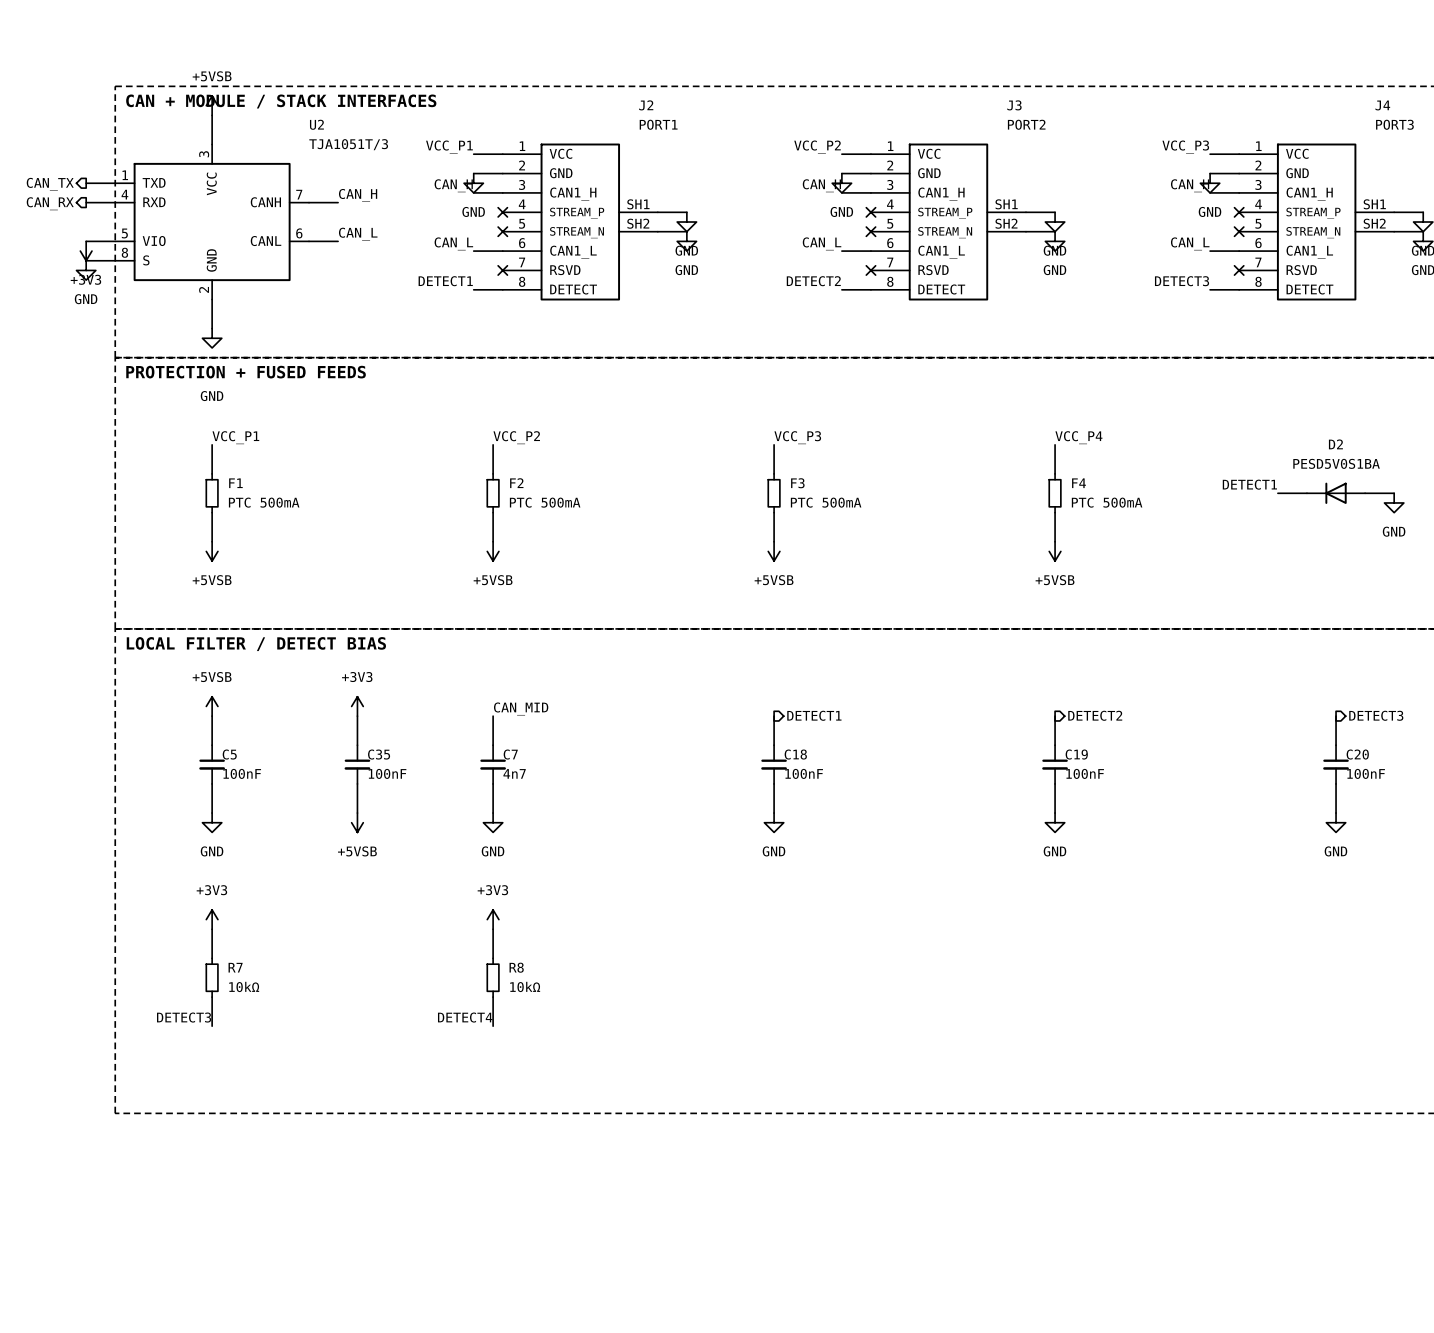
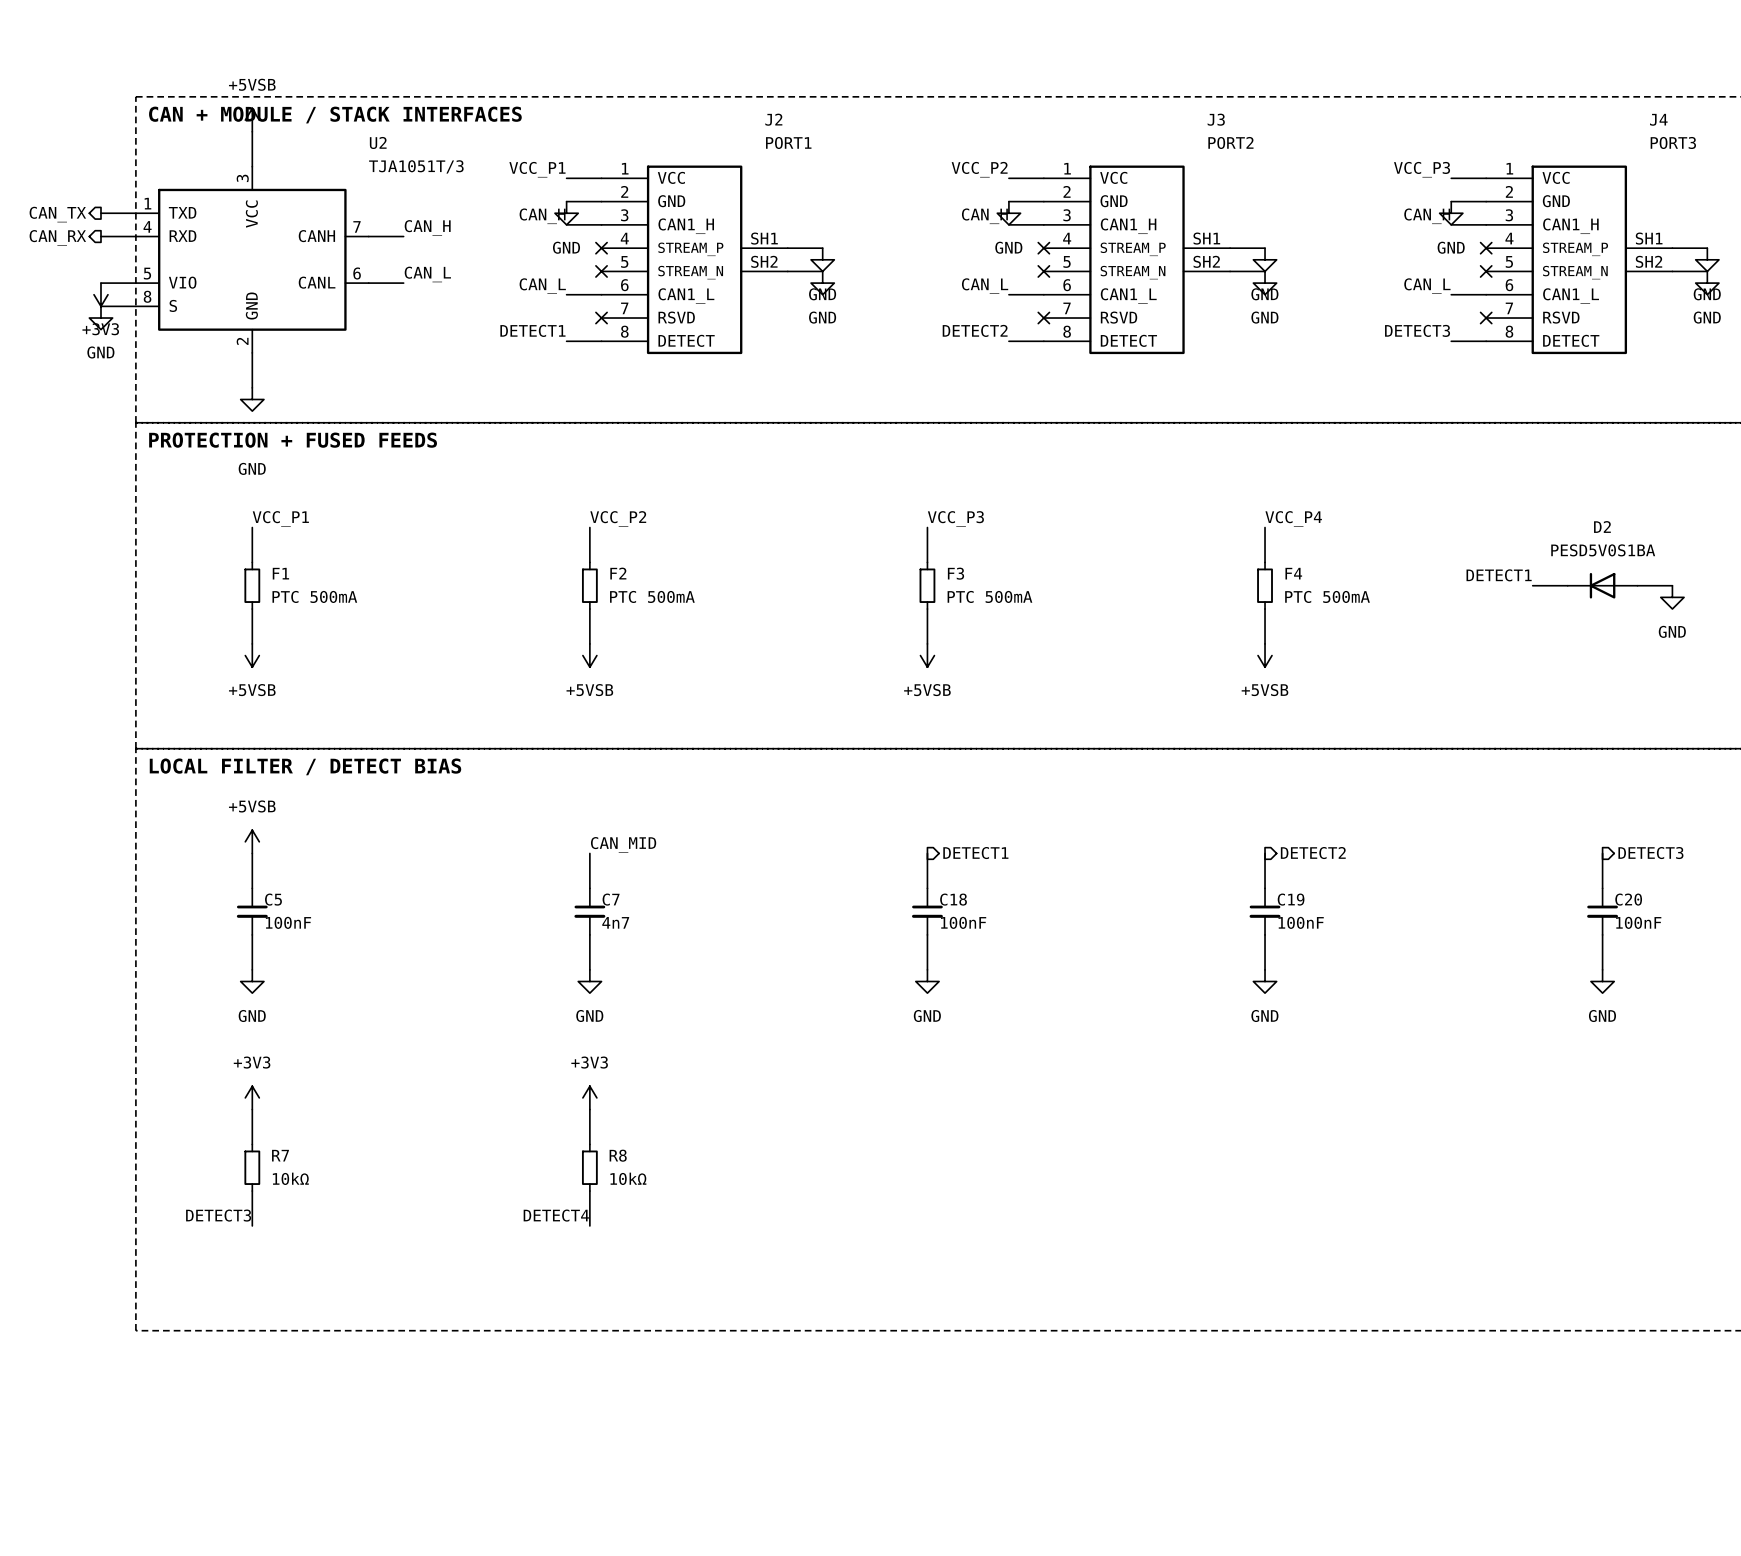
power symbol: +3V3 (357, 706) -> none
wire: (357, 716) (357, 745) -> none
C35: 100nF (357, 764) -> none
wire: (357, 783) (357, 813) -> none
power symbol: +5VSB (357, 822) -> none

